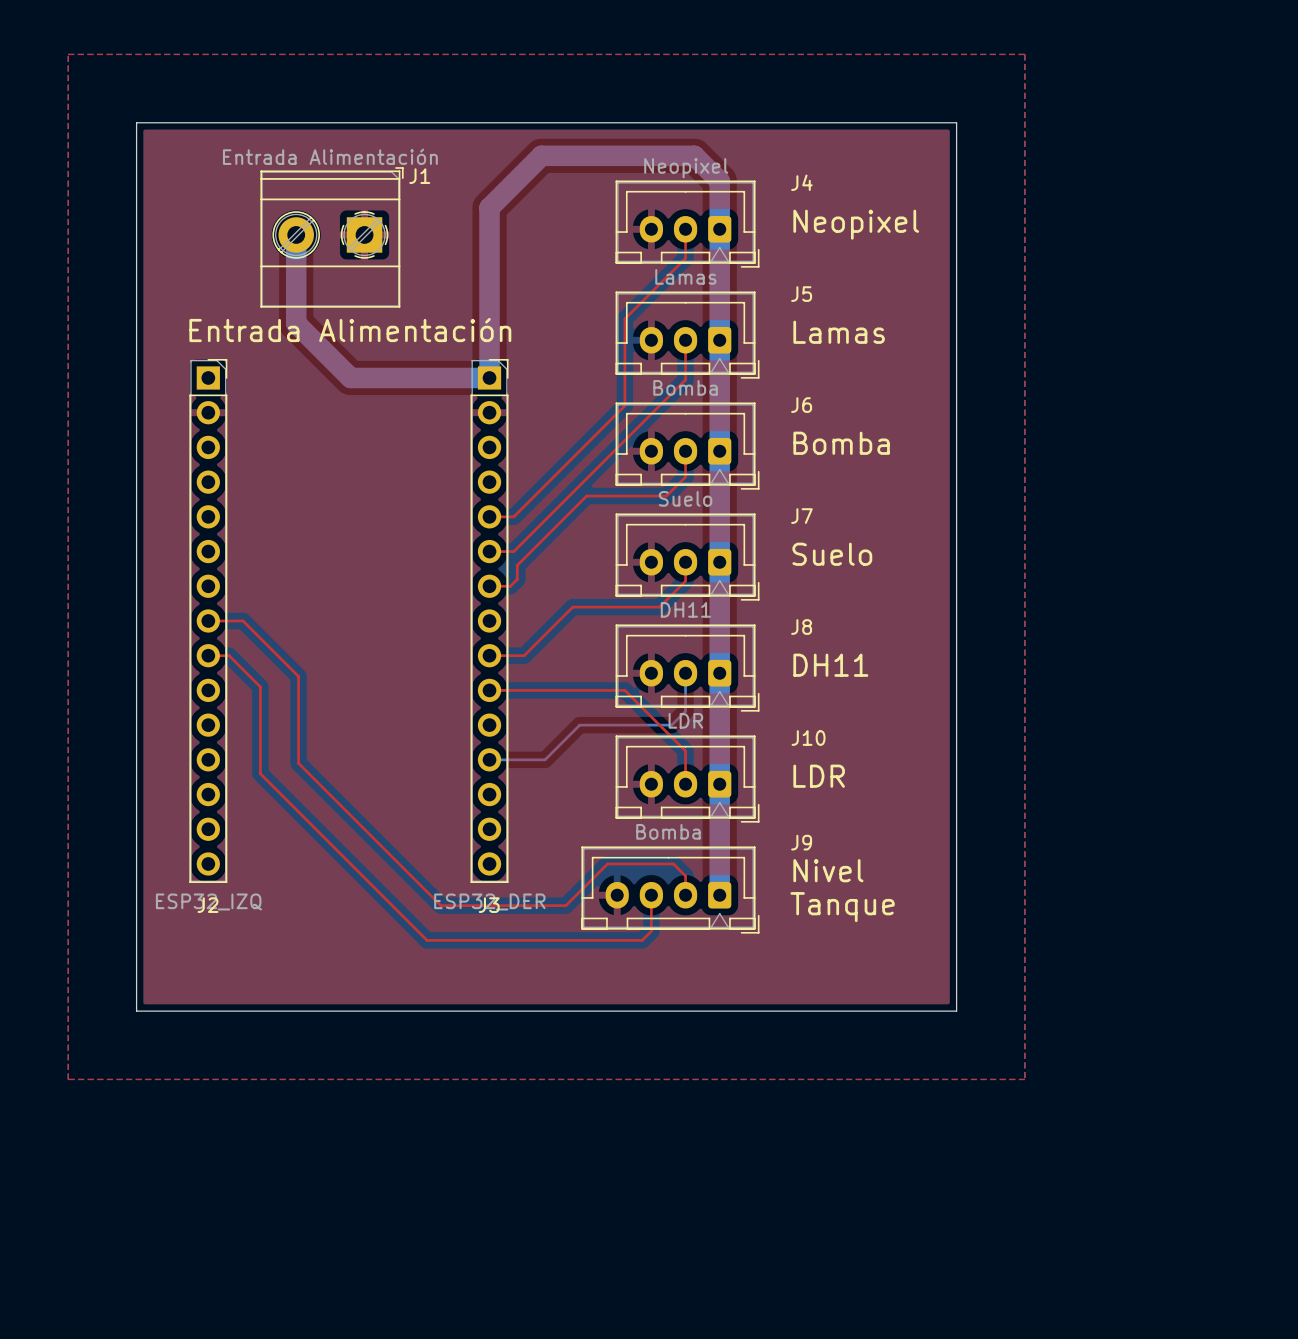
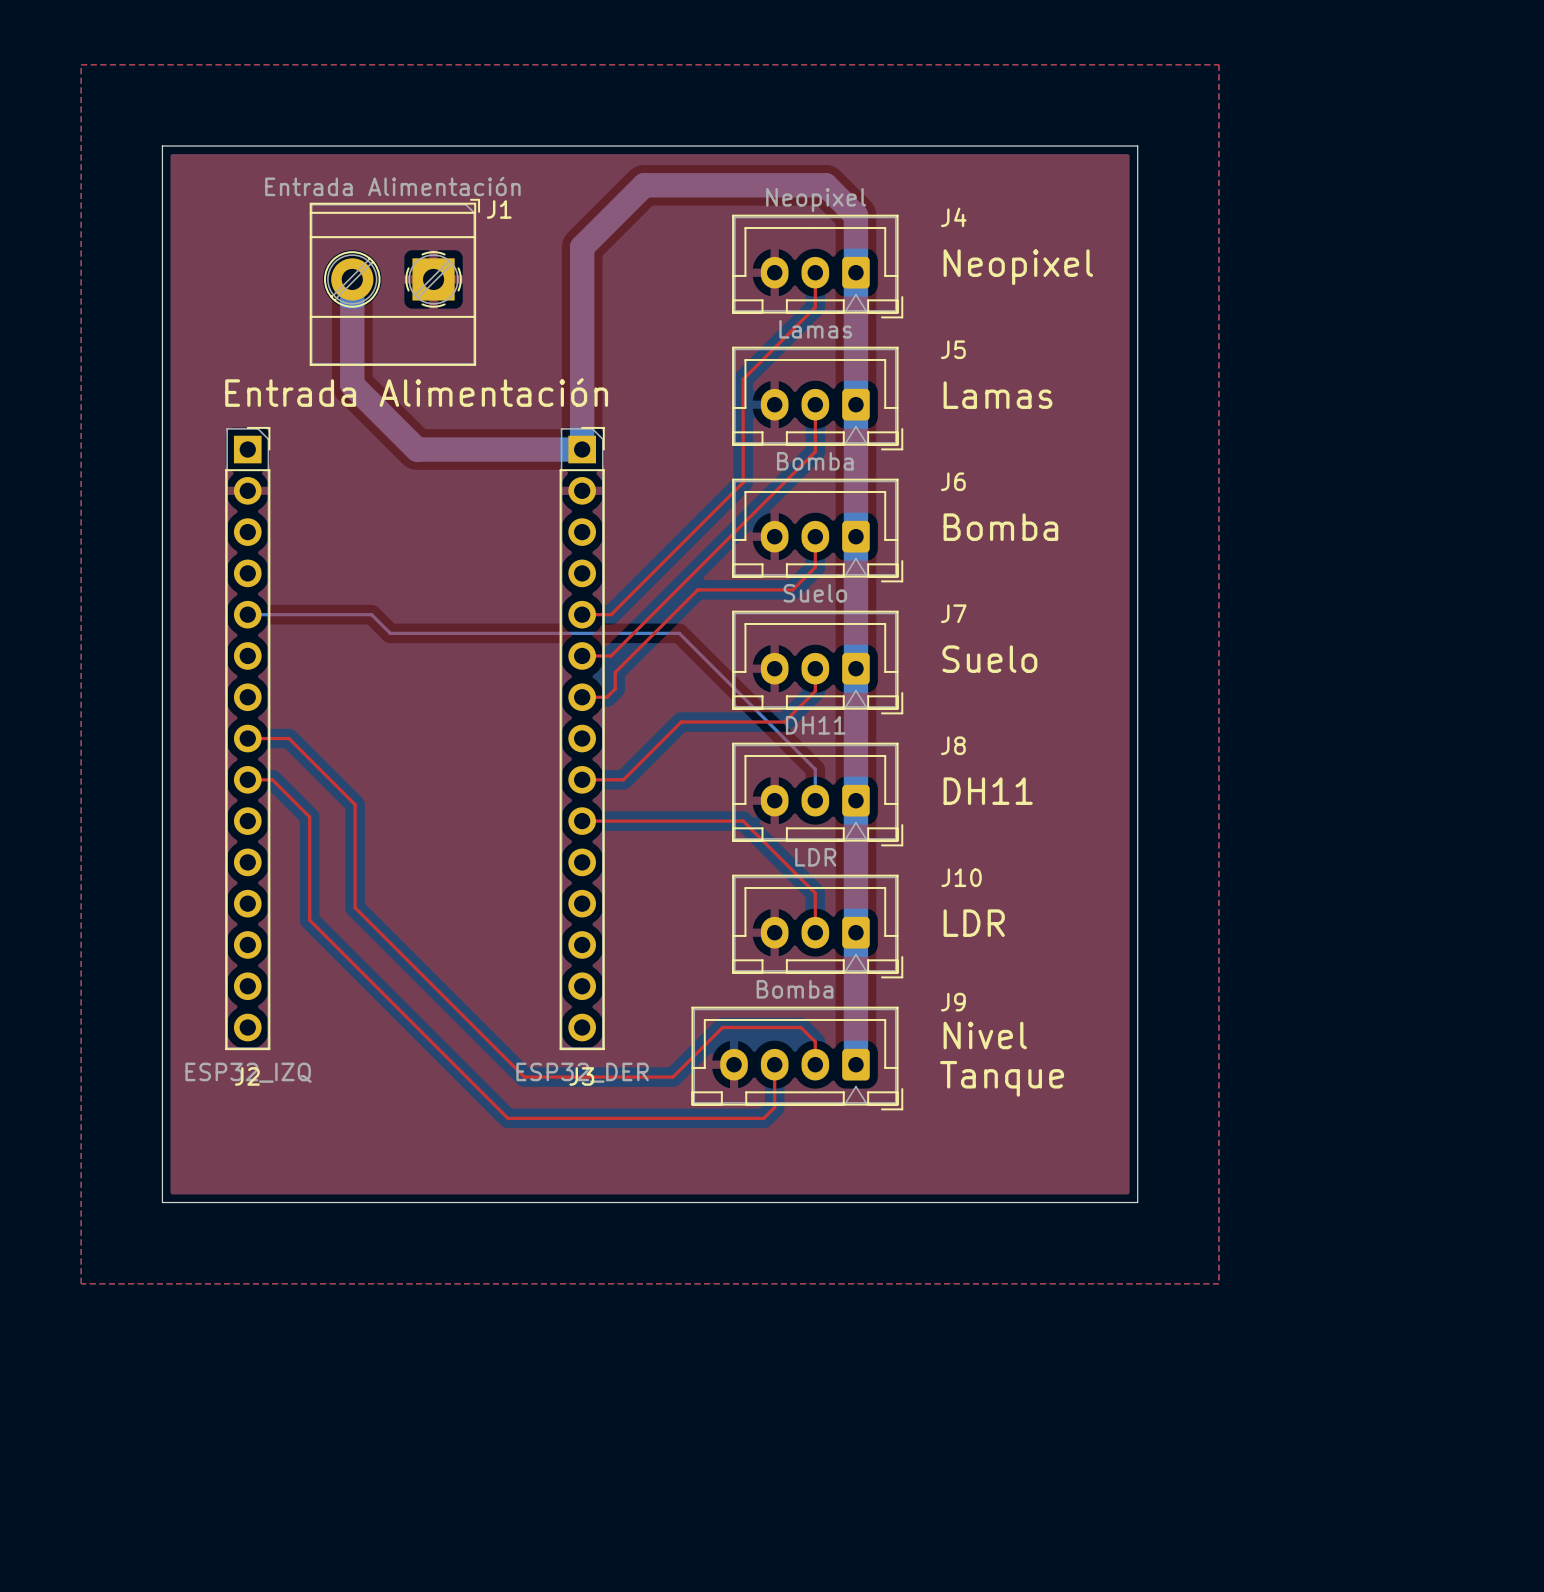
bottom track: (685, 673) (685, 711) (671, 725) (579, 725) (545, 759) (489, 759) -> (815, 800) (815, 769) (679, 633) (390, 633) (371, 614) (247, 614)

